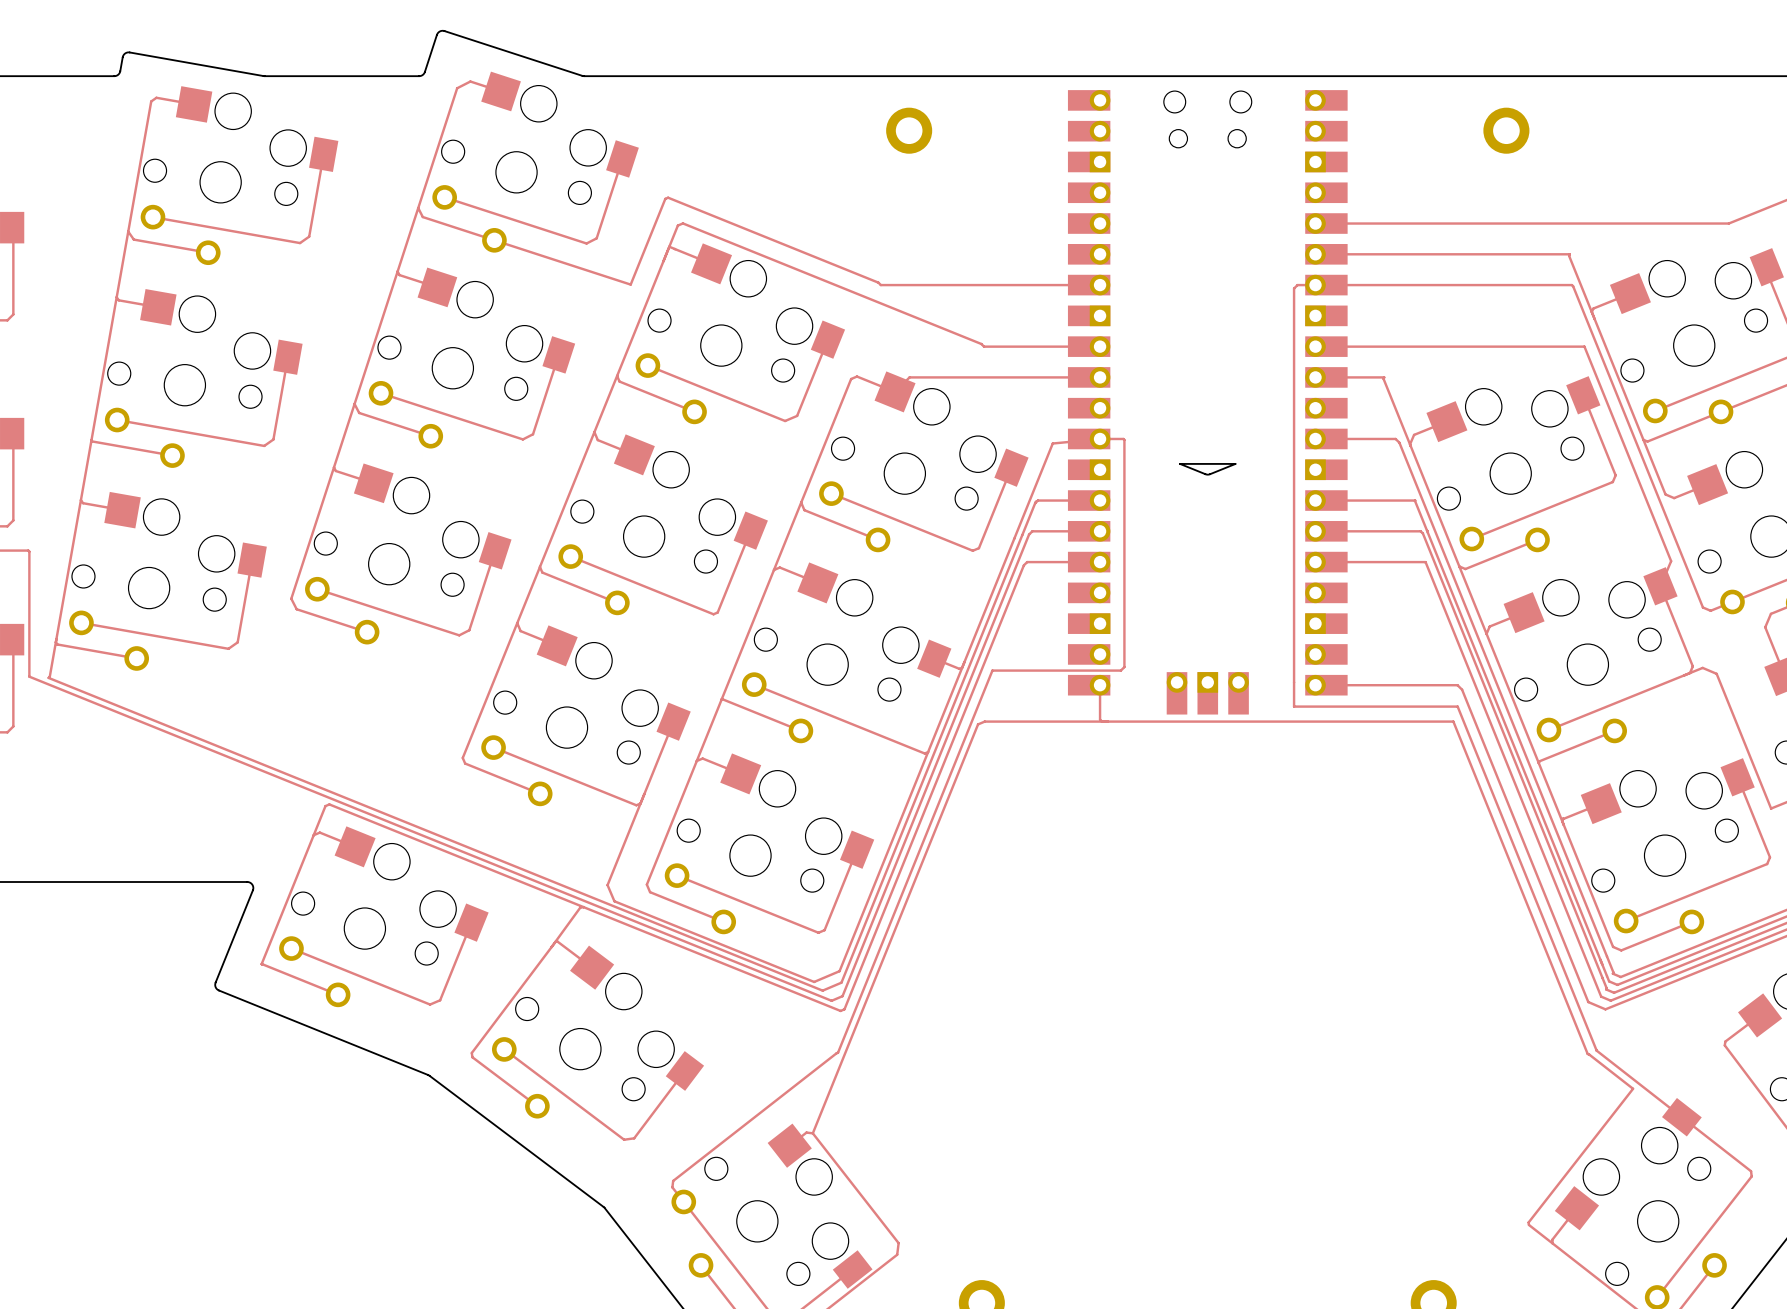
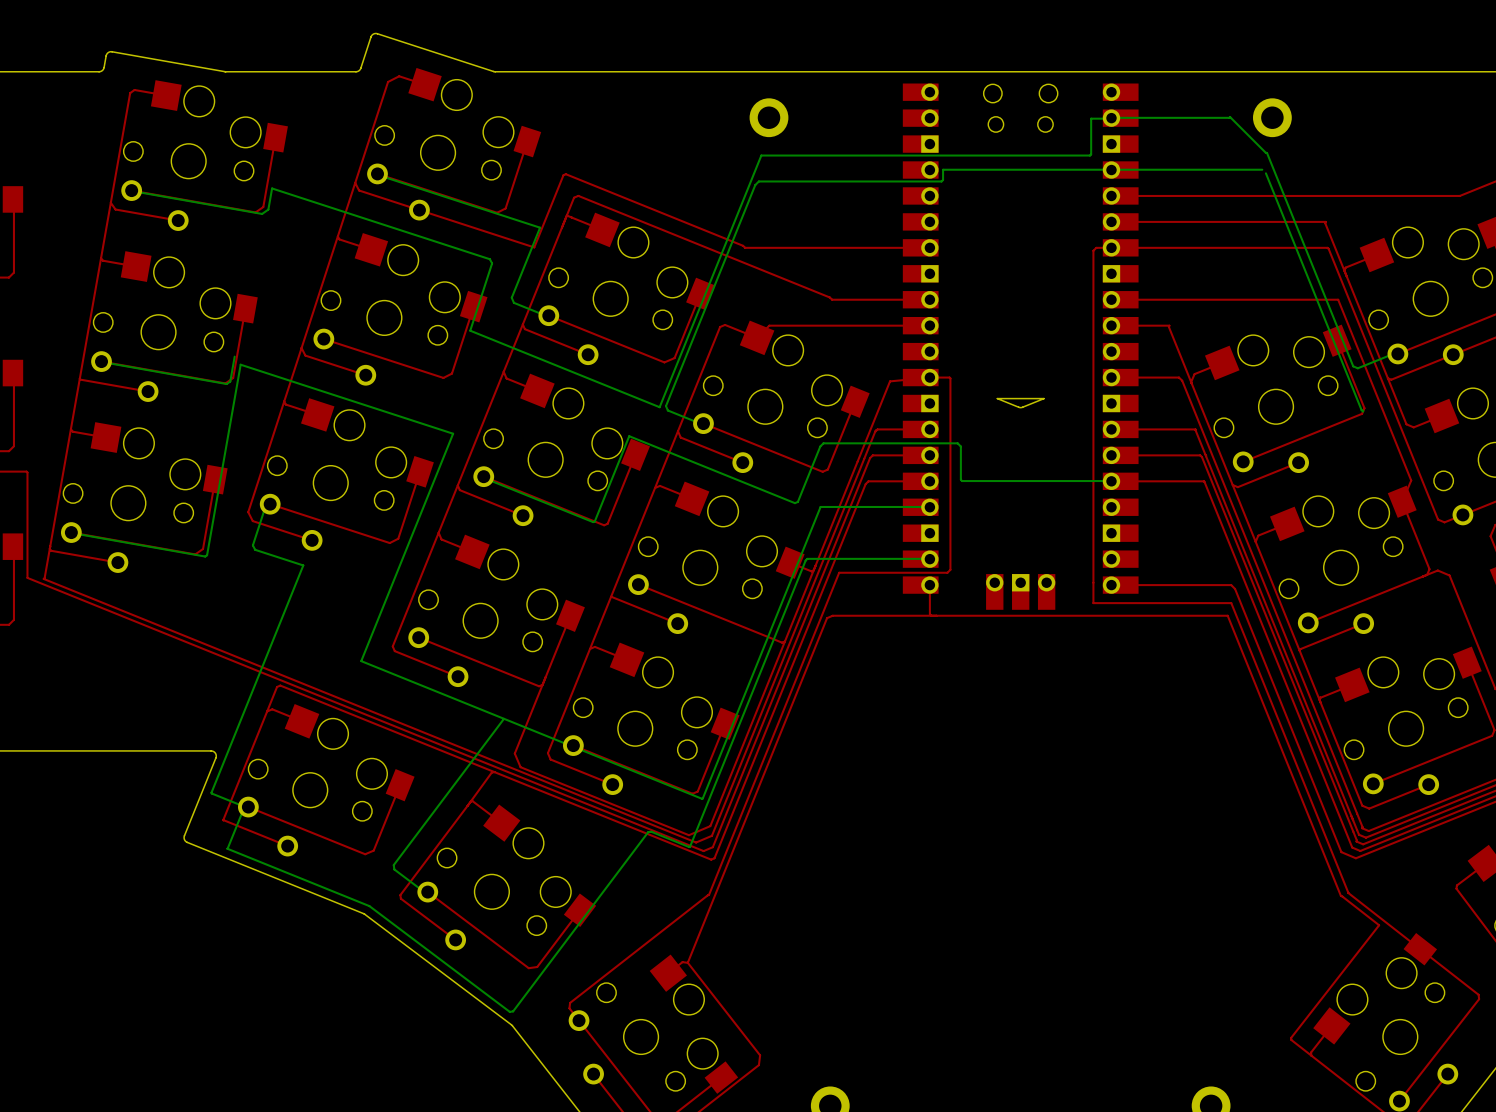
bottom track: none -> (1262, 169) (943, 169) (941, 181) (758, 181) (755, 185) (665, 406) (667, 410) (699, 423)
bottom track: none -> (1265, 173) (1362, 411)
bottom track: none -> (373, 173) (540, 227) (511, 297) (513, 302) (544, 315)
bottom track: none -> (127, 190) (262, 213) (268, 209) (272, 188) (489, 259) (492, 263) (470, 330) (659, 407) (761, 155) (1090, 155) (1091, 118) (1230, 117) (1267, 152) (1353, 366) (1357, 368) (1394, 353)
bottom track: none -> (234, 356) (230, 381) (226, 384) (97, 361)
bottom track: none -> (479, 476) (593, 522) (629, 436) (794, 503) (797, 501) (820, 446) (823, 443) (957, 443) (960, 446) (962, 481) (1107, 481)
bottom track: none -> (266, 503) (252, 545) (255, 549) (303, 565) (211, 792) (244, 806) (227, 848) (369, 906) (509, 1011) (513, 1011) (648, 832) (690, 846) (805, 560) (807, 558) (926, 558)
bottom track: none -> (926, 506) (820, 506) (702, 798) (361, 661)
bottom track: none -> (67, 532) (205, 556) (207, 555) (240, 364) (453, 433) (361, 661)
bottom track: none -> (504, 718) (393, 865) (394, 869) (423, 891)

